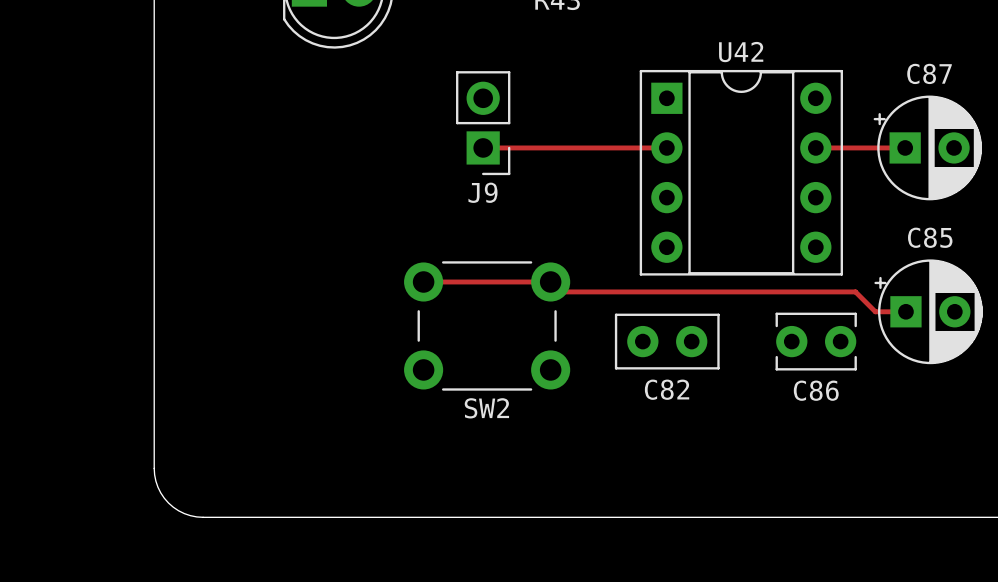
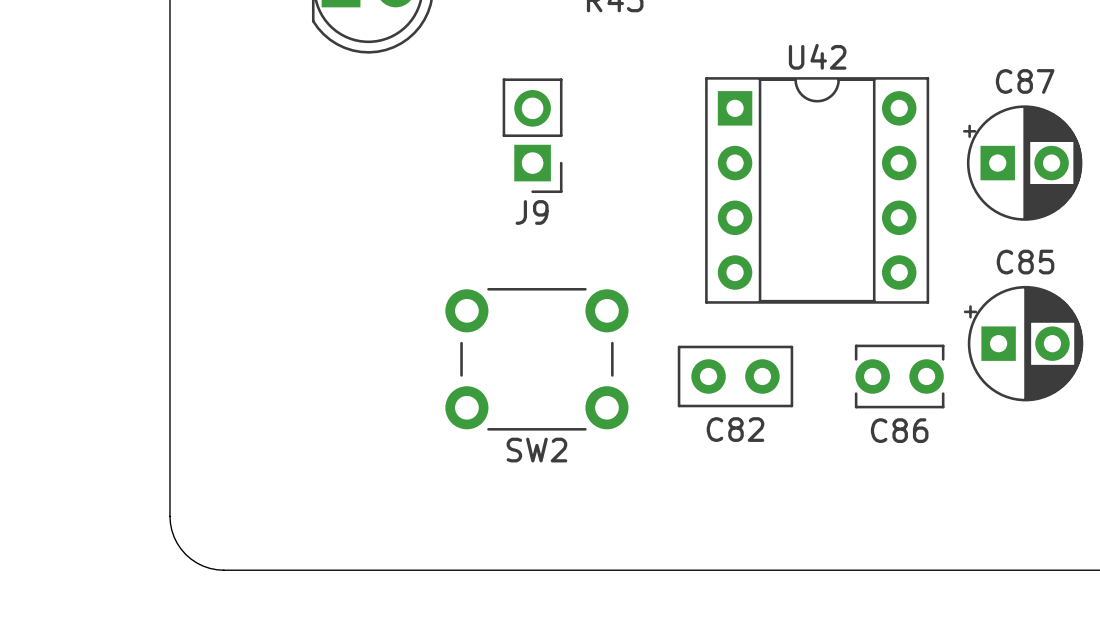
track: (483, 147) (666, 147) -> none
track: (815, 147) (905, 147) -> none
track: (423, 281) (550, 281) (560, 291) (855, 291) (875, 311) (905, 311) -> none

